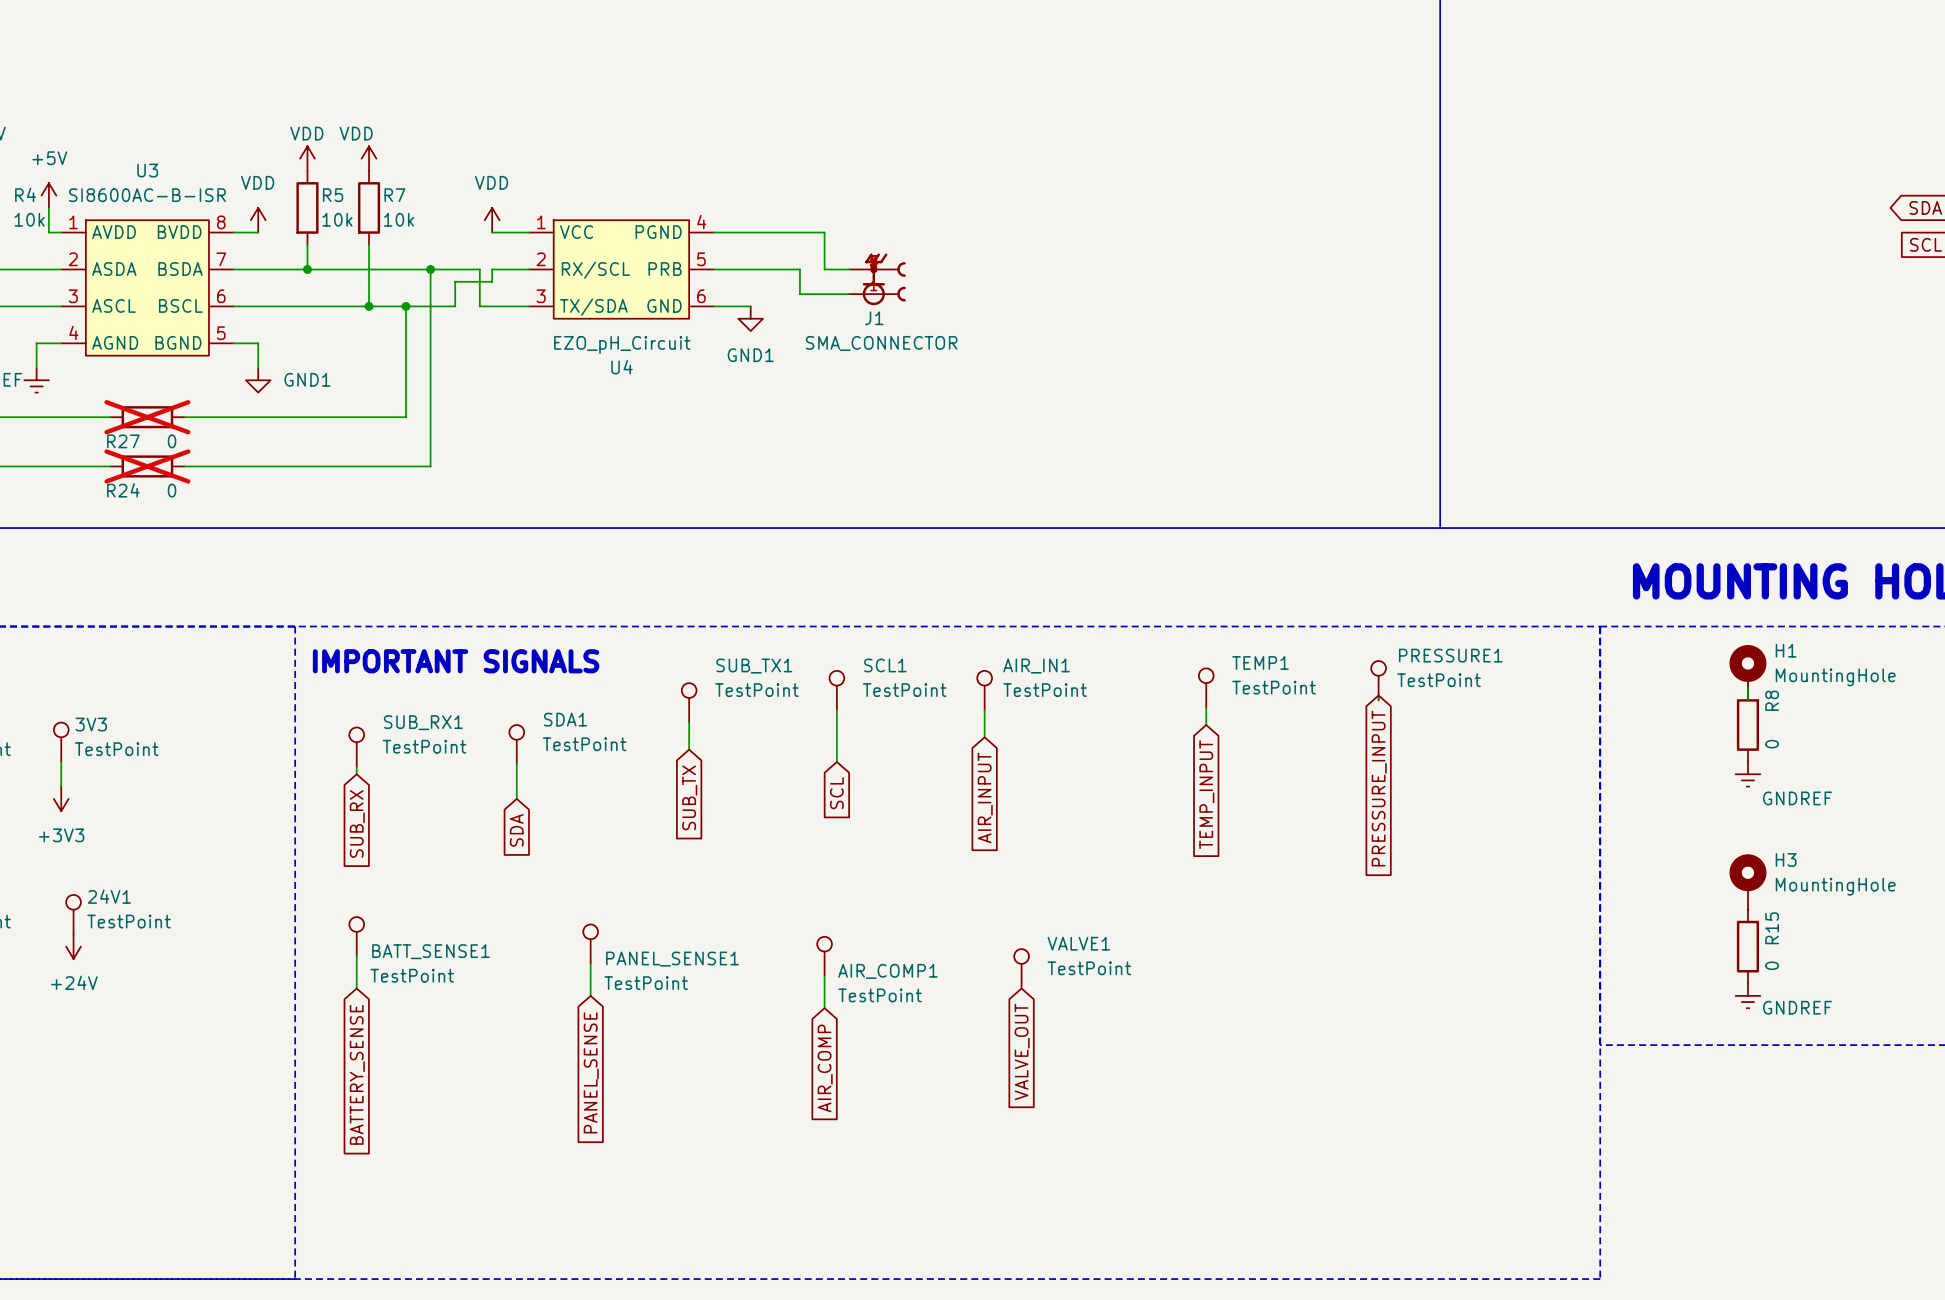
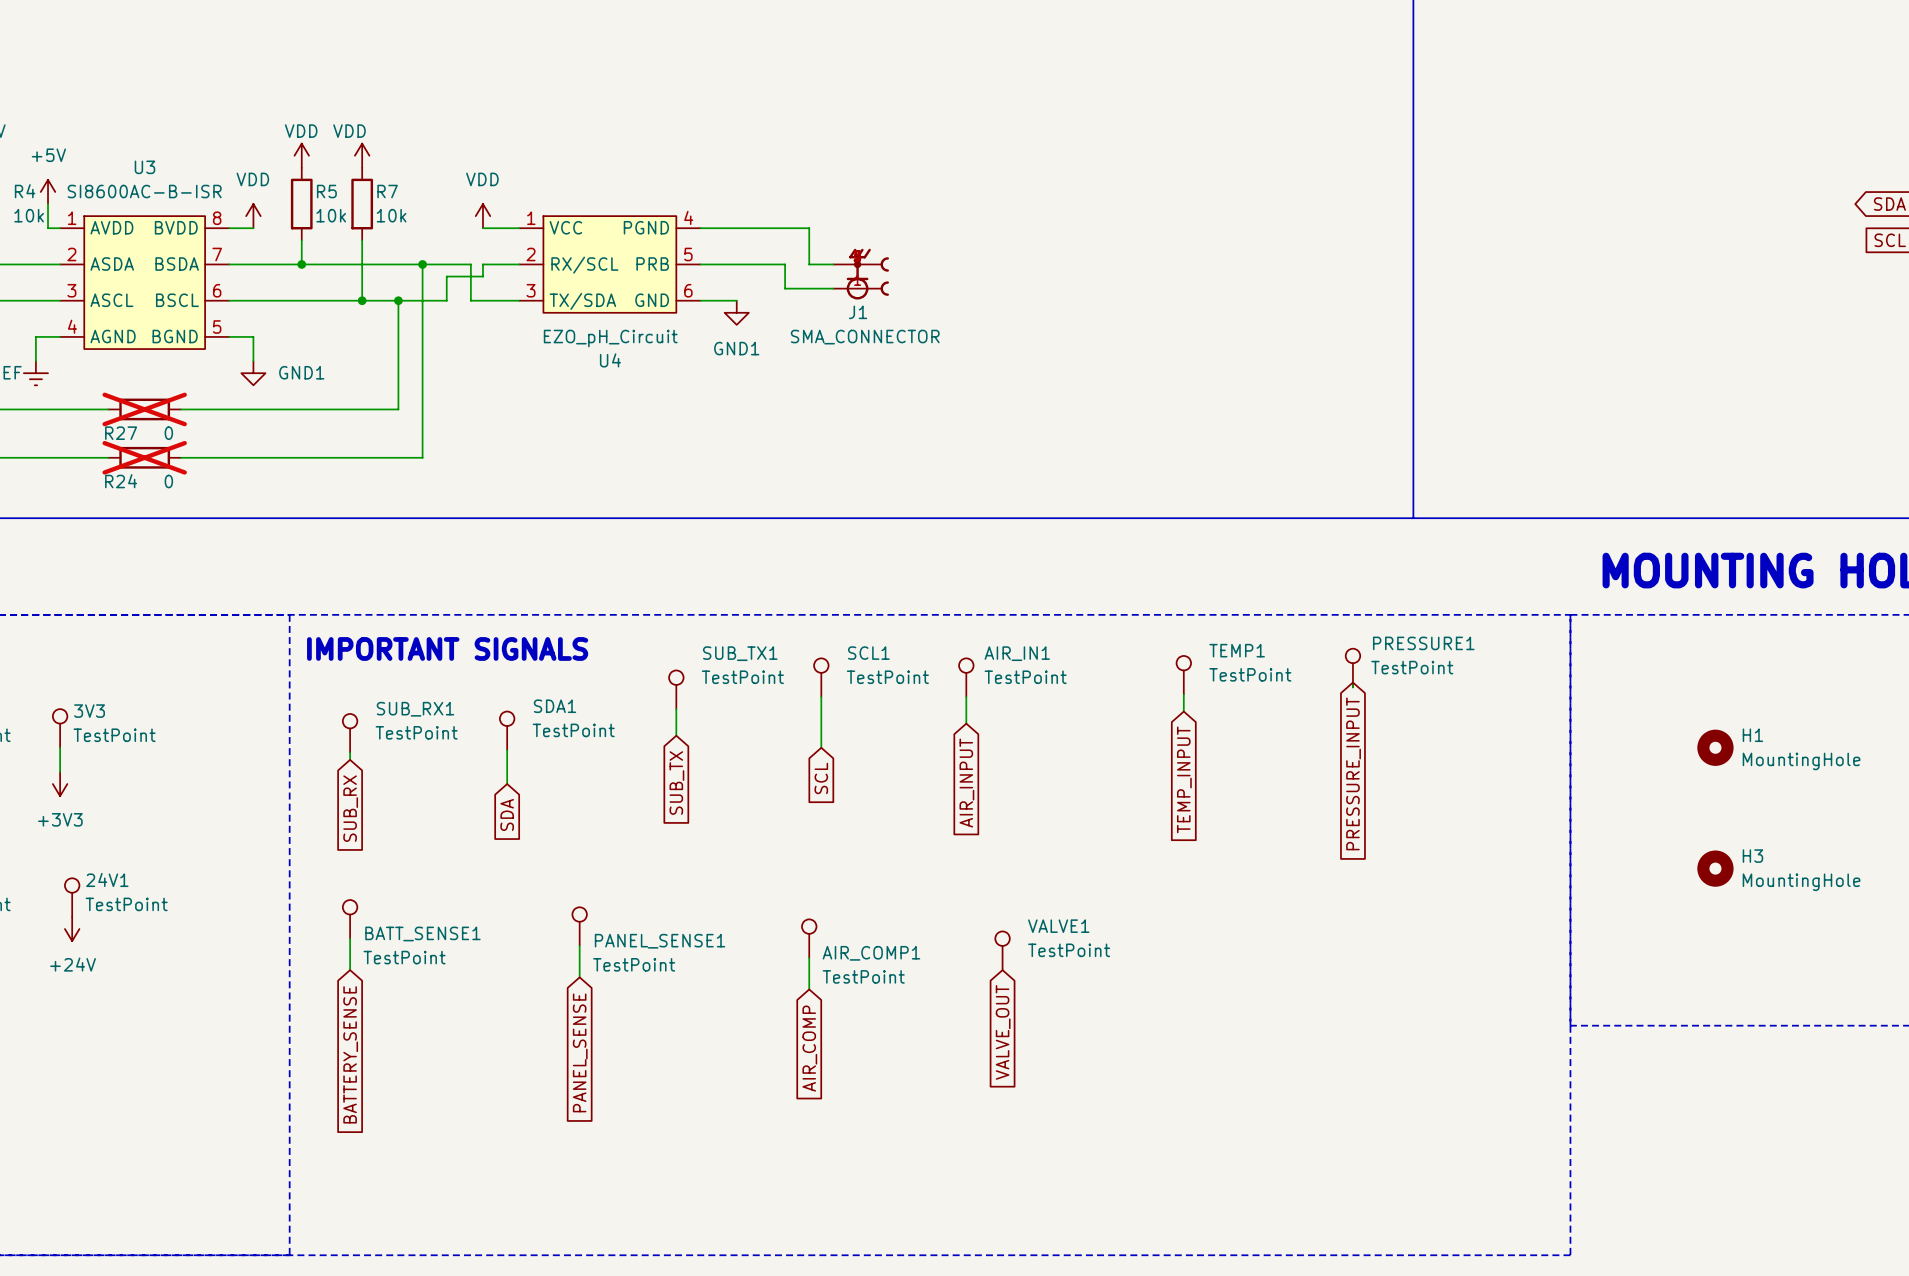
H1 symbol: [1729, 644, 1767, 701] -> [1697, 729, 1734, 766]
wire: (1747, 688) (1747, 700) -> none
R8: 0 (1747, 725) -> none
power symbol: GNDREF (1747, 774) -> none
H3 symbol: [1729, 854, 1767, 910] -> [1697, 850, 1734, 887]
R15: 0 (1747, 946) -> none
power symbol: GNDREF (1747, 995) -> none

